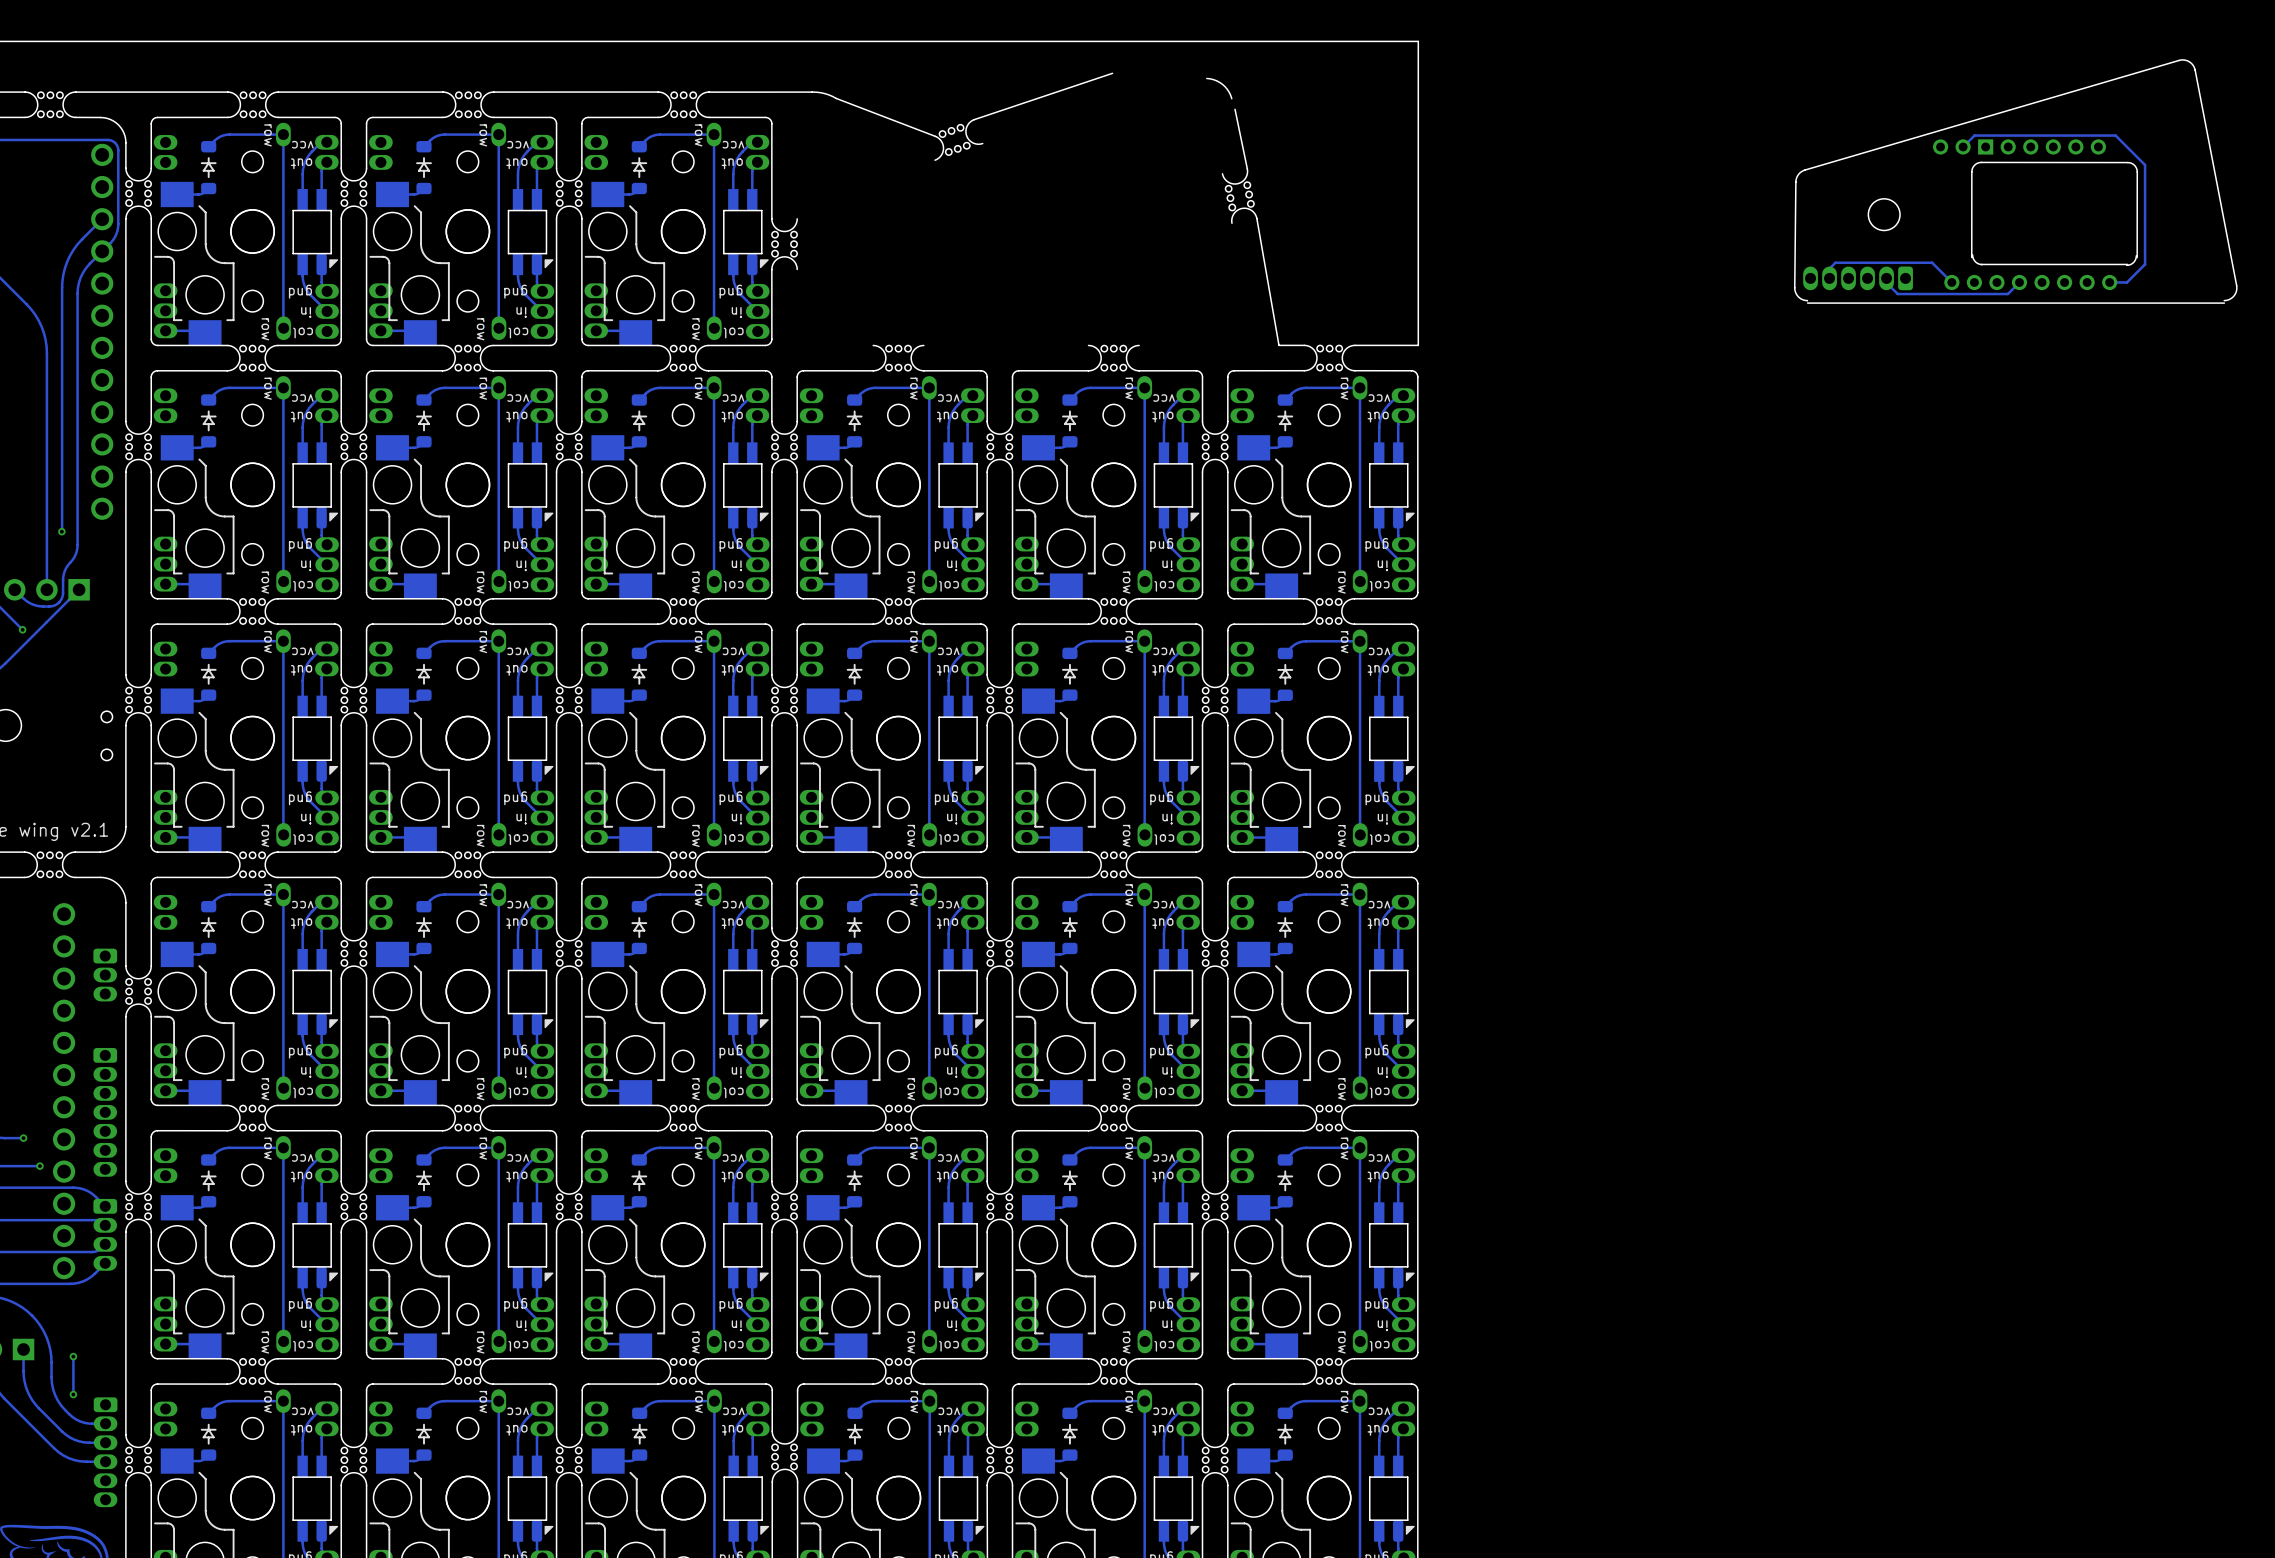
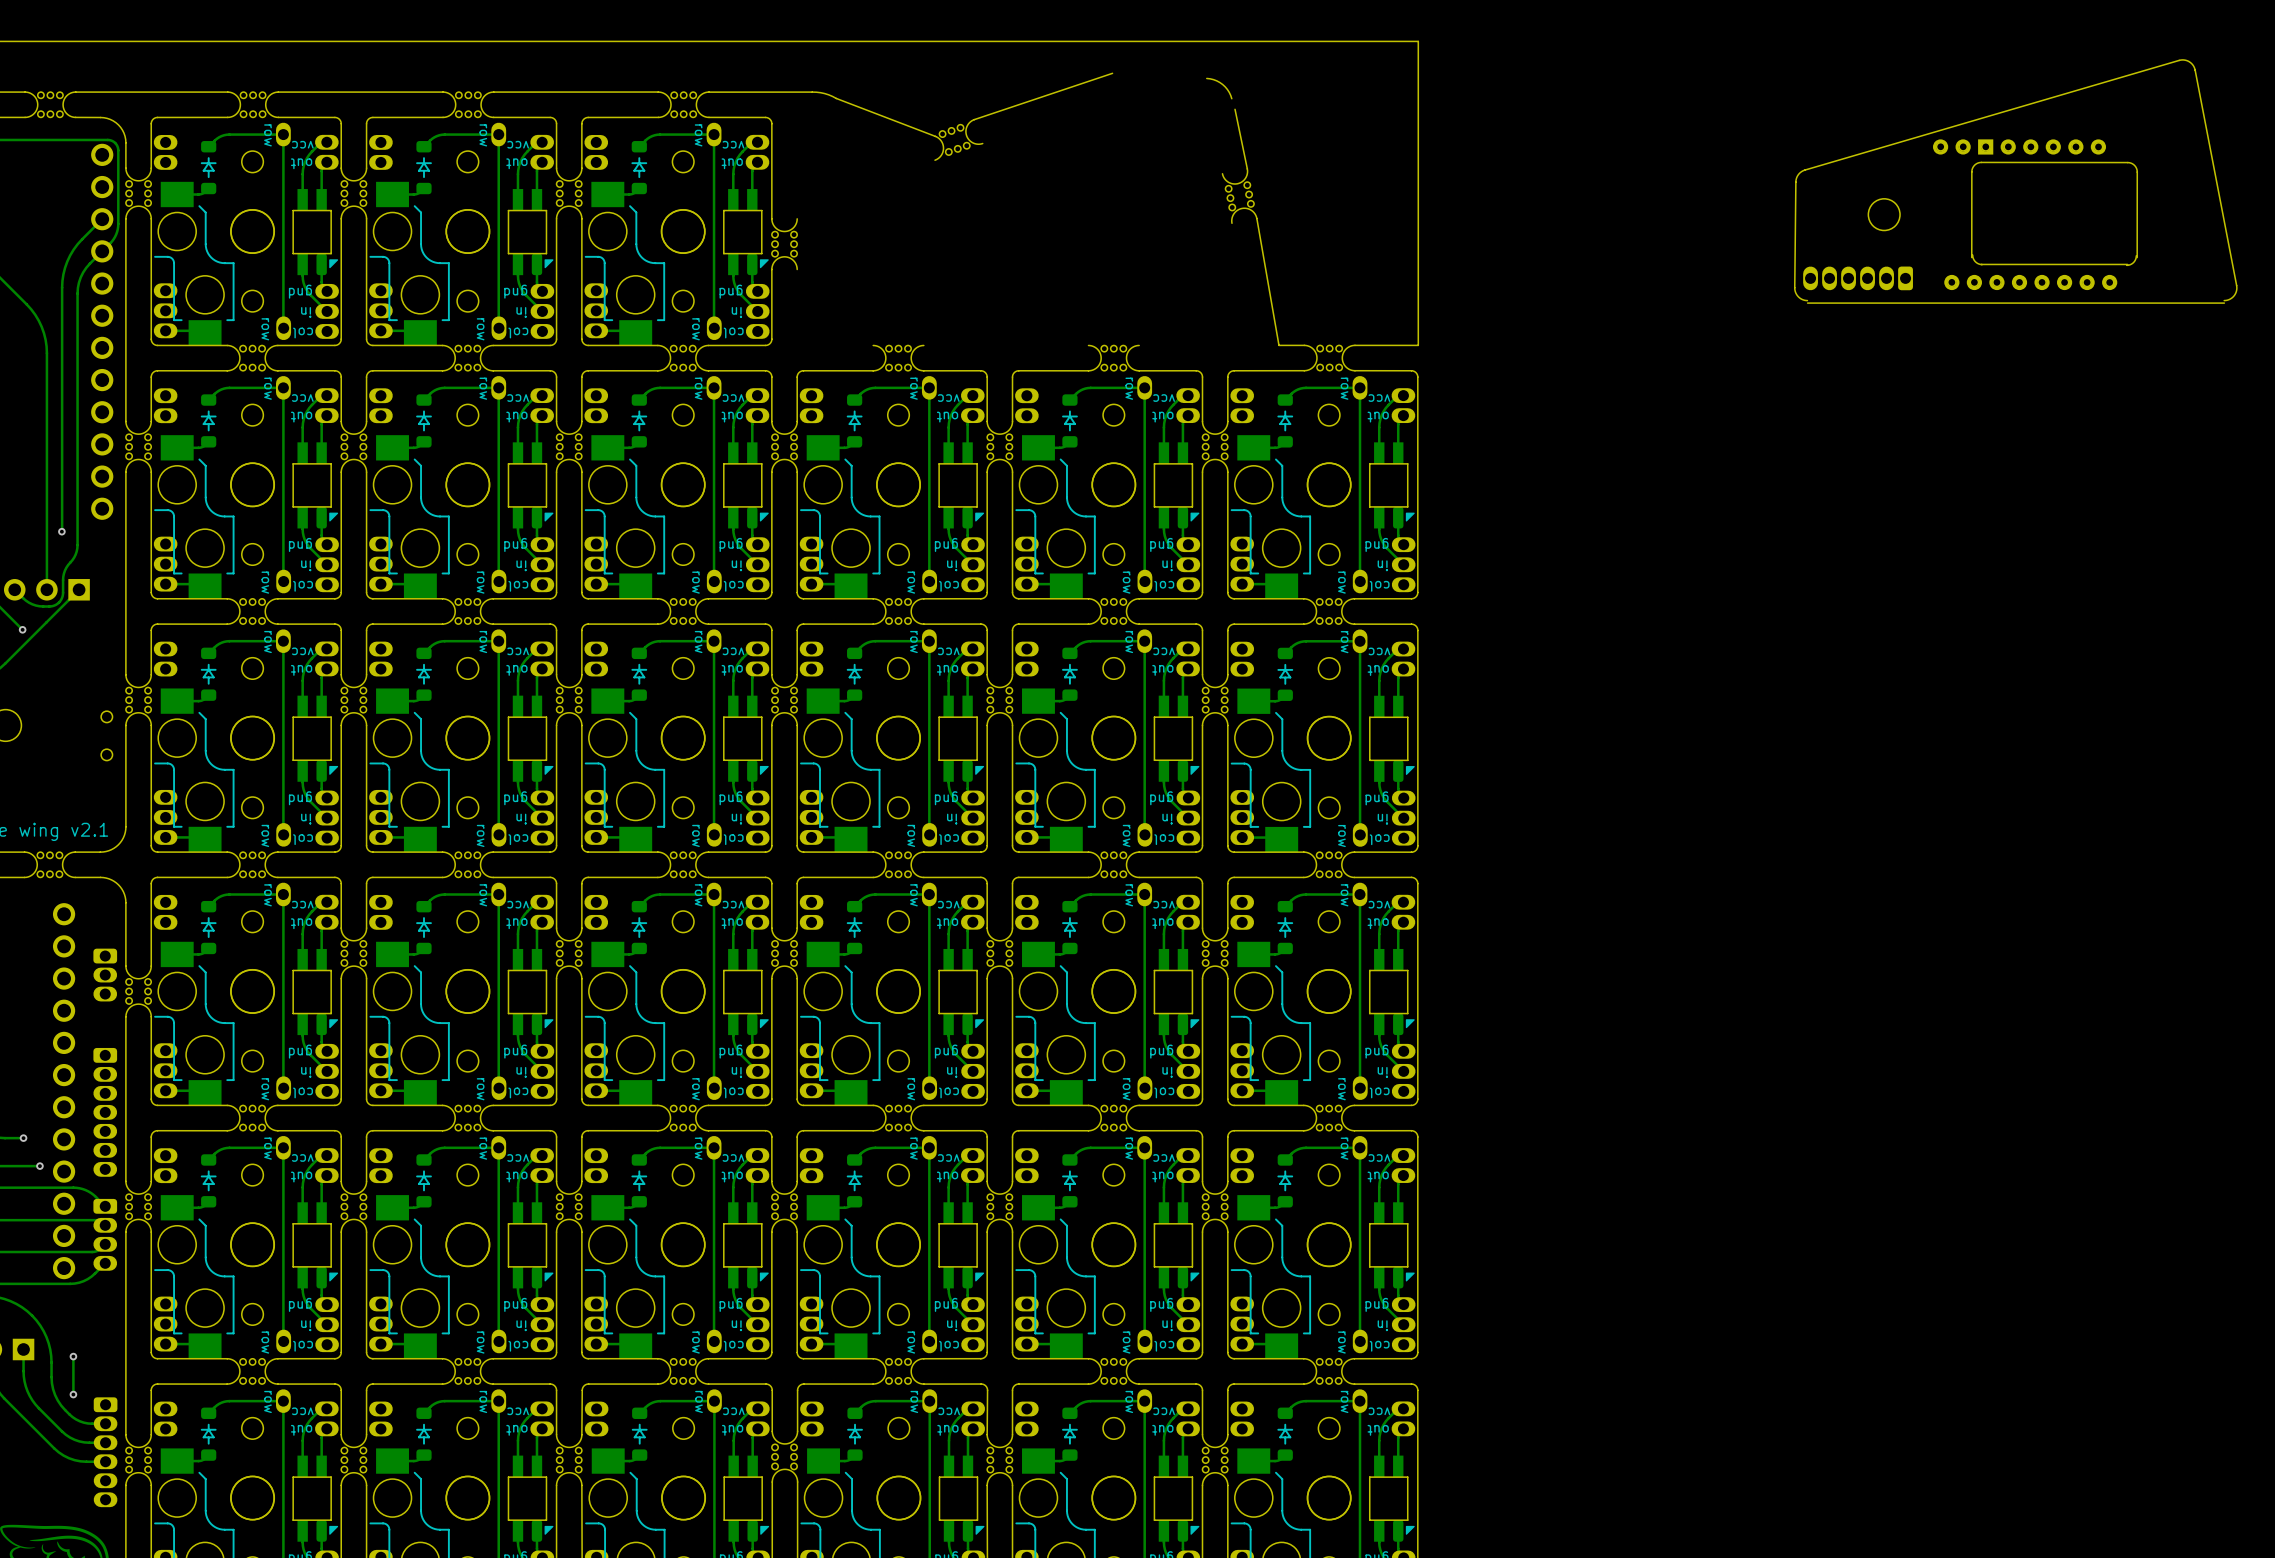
round board edge: none -> [1936, 142, 1945, 151]
round board edge: none -> [1959, 142, 1968, 151]
round board edge: none -> [1981, 142, 1990, 152]
round board edge: none -> [2004, 142, 2013, 152]
round board edge: none -> [2026, 142, 2036, 152]
round board edge: none -> [2049, 142, 2058, 152]
round board edge: none -> [2071, 142, 2081, 152]
round board edge: none -> [2094, 142, 2103, 152]
track: (1963, 146) (1974, 135) (2115, 135) (2145, 164) (2145, 264) (2126, 282) (2109, 282) -> none
track: (1829, 278) (1829, 268) (1835, 262) (1932, 262) (1951, 282) -> none
track: (1886, 278) (1886, 282) (1897, 294) (2007, 294) (2019, 282) -> none
round board edge: none -> [1947, 278, 1957, 287]
round board edge: none -> [1970, 278, 1979, 287]
round board edge: none -> [1992, 278, 2002, 287]
round board edge: none -> [2015, 278, 2024, 287]
round board edge: none -> [2037, 278, 2047, 287]
round board edge: none -> [2060, 278, 2069, 287]
round board edge: none -> [2082, 278, 2092, 287]
round board edge: none -> [2105, 278, 2114, 287]

